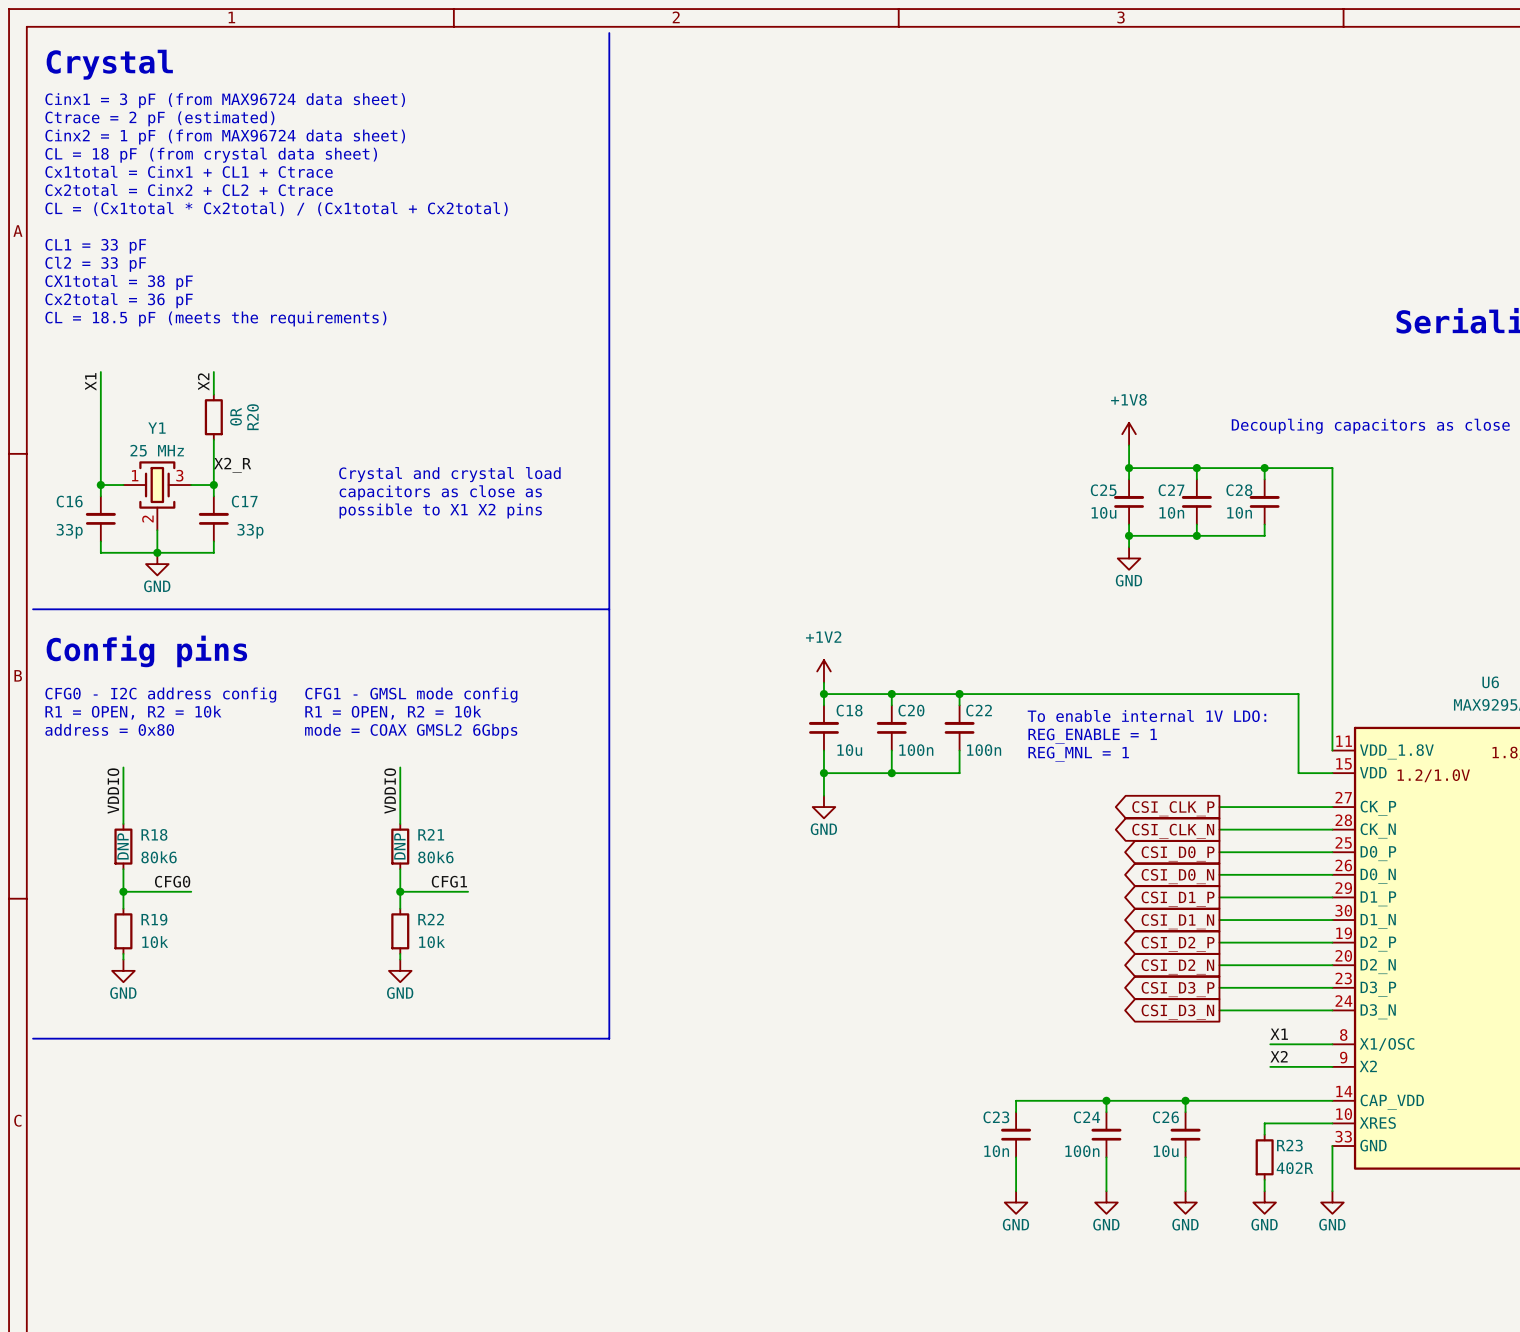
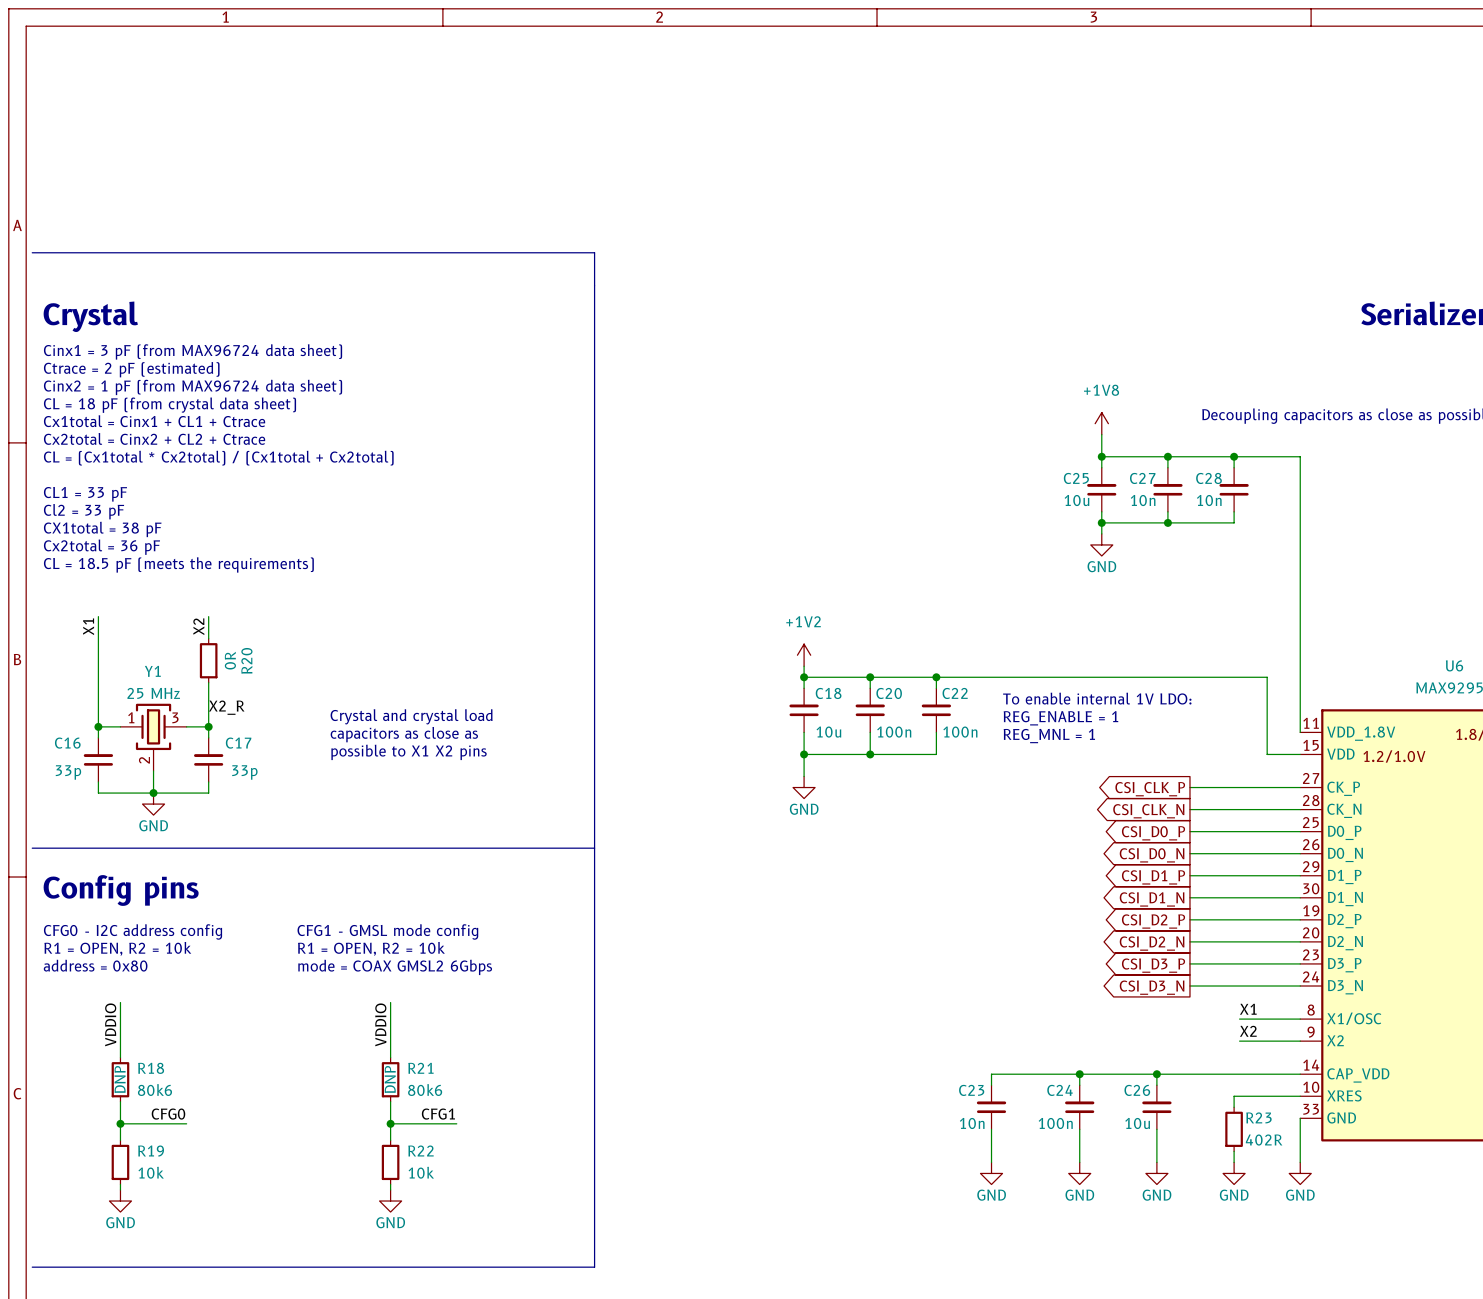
line: (609, 33) (609, 259) -> (32, 252) (594, 252)
text: Crystal (109, 64) -> none
text: Cinx1 = 3 pF (from MAX96724 data sheet) (225, 100) -> none
text: Ctrace = 2 pF (estimated) (159, 118) -> none
text: Cinx2 = 1 pF (from MAX96724 data sheet) (225, 137) -> none
text: CL = 18 pF (from crystal data sheet) (211, 155) -> none
text: Cx1total = Cinx1 + CL1 + Ctrace (189, 171) -> none
text: Cx2total = Cinx2 + CL2 + Ctrace (189, 190) -> none
text: CL = (Cx1total * Cx2total) / (Cx1total + Cx2total) (276, 209) -> none
text: CL1 = 33 pF (95, 246) -> none
text: Cl2 = 33 pF (95, 264) -> none
text: CX1total = 38 pF (119, 282) -> none
text: Cx2total = 36 pF (119, 300) -> none
text: CL = 18.5 pF (meets the requirements) (215, 318) -> none
text: none -> Crystal (90, 316)
text: none -> Cinx1 = 3 pF (from MAX96724 data sheet) (193, 351)
wire: (100, 372) (100, 496) -> none
wire: (213, 372) (213, 394) -> none
text: none -> Ctrace = 2 pF (estimated) (131, 369)
label: X1 (90, 381) -> none
label: X2 (203, 381) -> none
text: none -> Cinx2 = 1 pF (from MAX96724 data sheet) (193, 387)
text: none -> CL = 18 pF (from crystal data sheet) (170, 405)
R20 position: (213, 417) -> (208, 660)
text: none -> Cx1total = Cinx1 + CL1 + Ctrace (154, 421)
wire: (213, 439) (213, 496) -> none
text: none -> Cx2total = Cinx2 + CL2 + Ctrace (154, 438)
label: X2_R (232, 465) -> none
text: none -> CL = (Cx1total * Cx2total) / (Cx1total + Cx2total) (218, 458)
text: Crystal and crystal load (449, 474) -> none
wire: (100, 485) (123, 485) -> none
junction: (100, 485) -> none
wire: (191, 485) (213, 485) -> none
junction: (213, 485) -> none
text: capacitors as close as (440, 492) -> none
Y1 position: (157, 495) -> (153, 737)
text: none -> CL1 = 33 pF (85, 494)
text: possible to X1 X2 pins (440, 510) -> none
C16 position: (100, 518) -> (98, 759)
C17 position: (213, 518) -> (208, 759)
text: none -> Cl2 = 33 pF (84, 511)
wire: (157, 530) (157, 552) -> (208, 616) (208, 638)
wire: (100, 541) (100, 552) (213, 552) (213, 541) -> none
text: none -> CX1total = 38 pF (102, 529)
junction: (157, 552) -> none
text: none -> Cx2total = 36 pF (101, 547)
power symbol: GND (157, 564) -> none
text: none -> CL = 18.5 pF (meets the requirements) (178, 564)
line: (33, 609) (609, 609) -> none
wire: none -> (98, 616) (98, 737)
label: none -> X1 (88, 626)
label: none -> X2 (198, 626)
text: Config pins (146, 651) -> none
text: CFG0 - I2C address config (160, 695) -> none
text: CFG1 - GMSL mode config (411, 695) -> none
text: R1 = OPEN, R2 = 10k (133, 712) -> none
text: R1 = OPEN, R2 = 10k (393, 712) -> none
label: none -> X2_R (226, 707)
text: address = 0x80 (109, 729) -> none
text: mode = COAX GMSL2 6Gbps (411, 731) -> none
text: none -> Crystal and crystal load (411, 716)
wire: none -> (98, 726) (120, 726)
junction: none -> (98, 726)
wire: none -> (186, 726) (208, 726)
junction: none -> (208, 726)
text: none -> capacitors as close as (404, 734)
wire: (123, 767) (123, 823) -> (208, 682) (208, 737)
wire: (400, 767) (400, 823) -> none
text: none -> possible to X1 X2 pins (409, 752)
wire: none -> (153, 770) (153, 793)
label: VDDIO (113, 791) -> none
label: VDDIO (390, 791) -> none
wire: none -> (98, 782) (98, 793) (208, 793) (208, 782)
junction: none -> (153, 793)
power symbol: none -> GND (153, 804)
R18 position: (123, 846) -> (120, 1079)
R21 position: (400, 846) -> (390, 1079)
line: none -> (32, 848) (594, 848)
wire: (123, 869) (123, 908) -> none
wire: (400, 869) (400, 908) -> none
label: CFG0 (172, 881) -> none
label: CFG1 (449, 881) -> none
wire: (123, 891) (191, 891) -> none
junction: (123, 891) -> none
wire: (400, 891) (468, 891) -> none
junction: (400, 891) -> none
text: none -> Config pins (121, 890)
R19 position: (123, 931) -> (120, 1162)
R22 position: (400, 931) -> (390, 1162)
wire: (123, 953) (123, 959) -> none
wire: (400, 953) (400, 959) -> none
text: none -> CFG0 - I2C address config (133, 931)
text: none -> CFG1 - GMSL mode config (387, 931)
power symbol: GND (123, 970) -> none
power symbol: GND (400, 970) -> none
text: none -> R1 = OPEN, R2 = 10k (117, 948)
text: none -> R1 = OPEN, R2 = 10k (371, 948)
text: none -> address = 0x80 (95, 965)
text: none -> mode = COAX GMSL2 6Gbps (395, 967)
wire: none -> (120, 1002) (120, 1057)
wire: none -> (390, 1002) (390, 1057)
line: (33, 1038) (609, 1038) -> (32, 1267) (594, 1267) (594, 1013)
label: none -> VDDIO (110, 1024)
label: none -> VDDIO (380, 1024)
wire: none -> (120, 1101) (120, 1140)
wire: none -> (390, 1101) (390, 1140)
label: none -> CFG0 (168, 1114)
label: none -> CFG1 (438, 1114)
wire: none -> (120, 1123) (186, 1123)
junction: none -> (120, 1123)
wire: none -> (390, 1123) (456, 1123)
junction: none -> (390, 1123)
wire: none -> (120, 1184) (120, 1189)
wire: none -> (390, 1184) (390, 1189)
power symbol: none -> GND (120, 1201)
power symbol: none -> GND (390, 1201)

